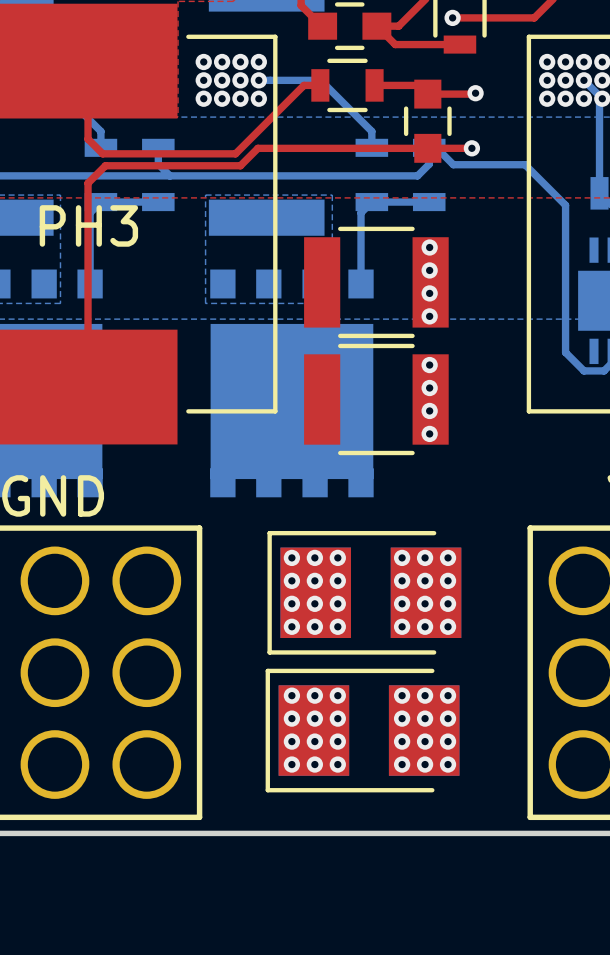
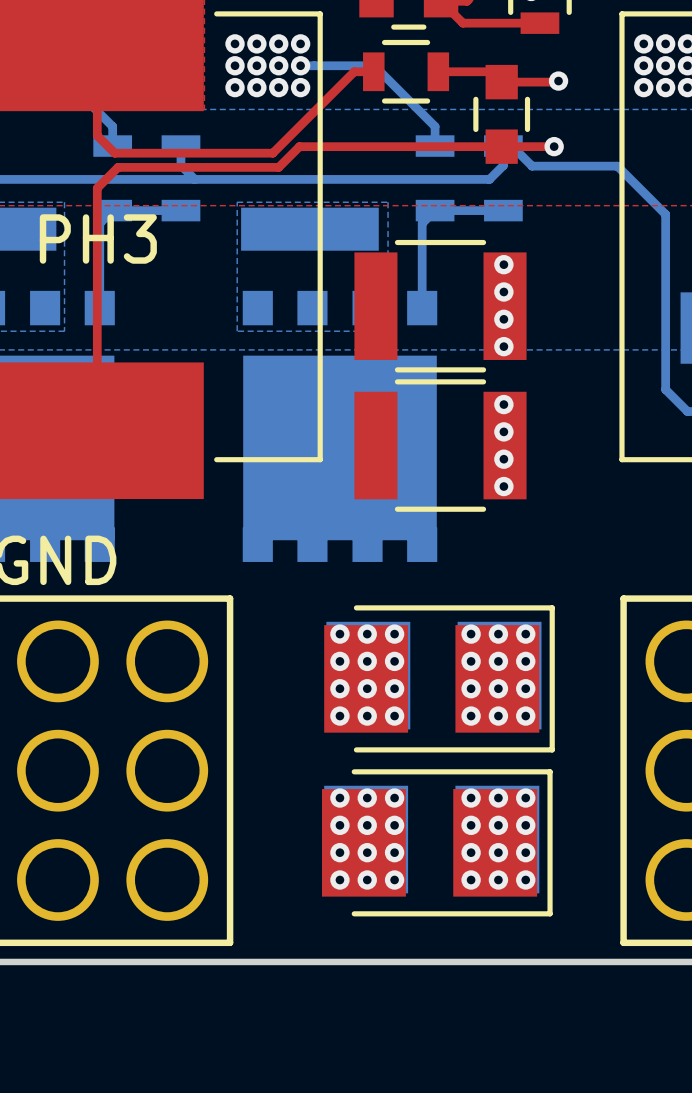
part rotation: 0° (364, 592) -> 180° (439, 678)
part rotation: 0° (362, 730) -> 180° (437, 842)

